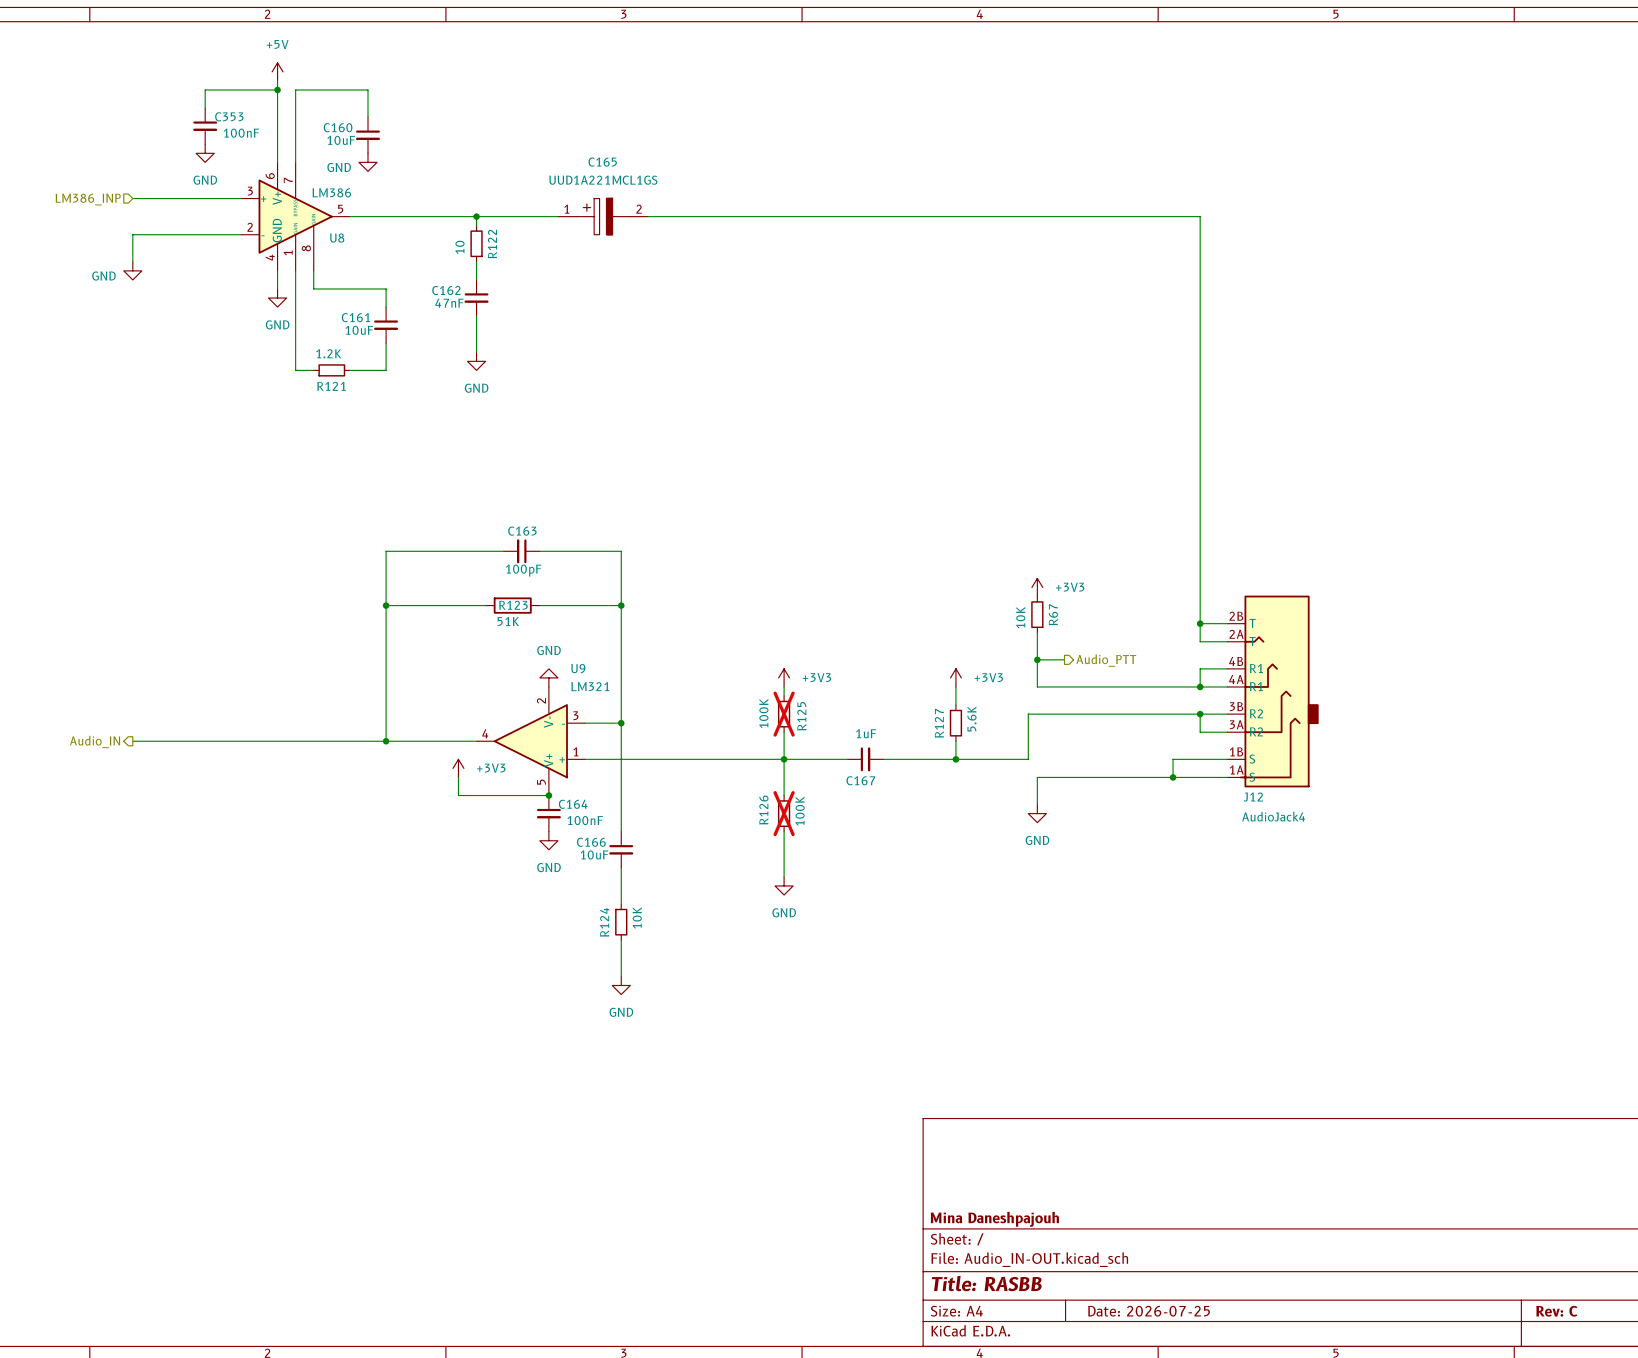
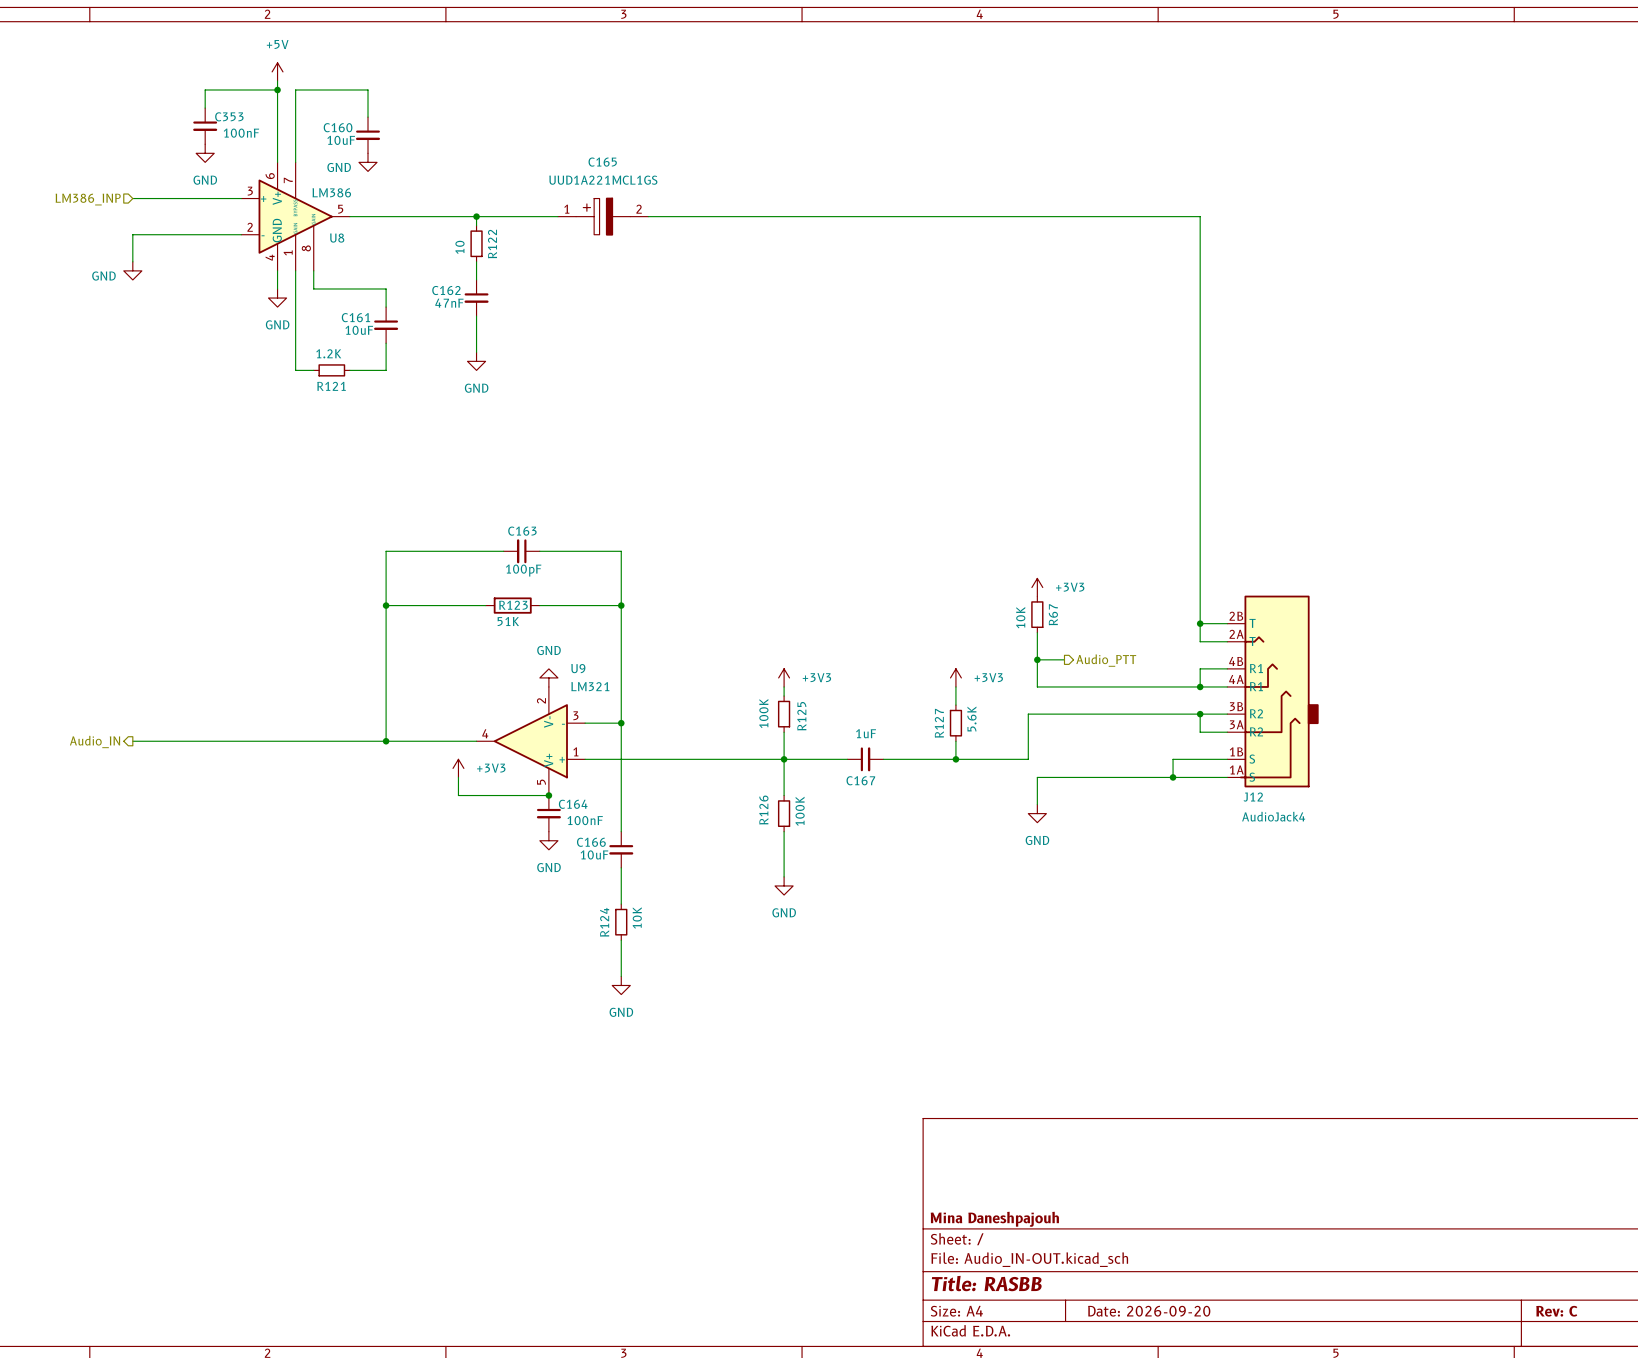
R125 do-not-place cross: (784, 714) -> none
R126 do-not-place cross: (784, 813) -> none
title block: Date: 2026-07-25 (1149, 1311) -> Date: 2026-09-20 (1149, 1311)

